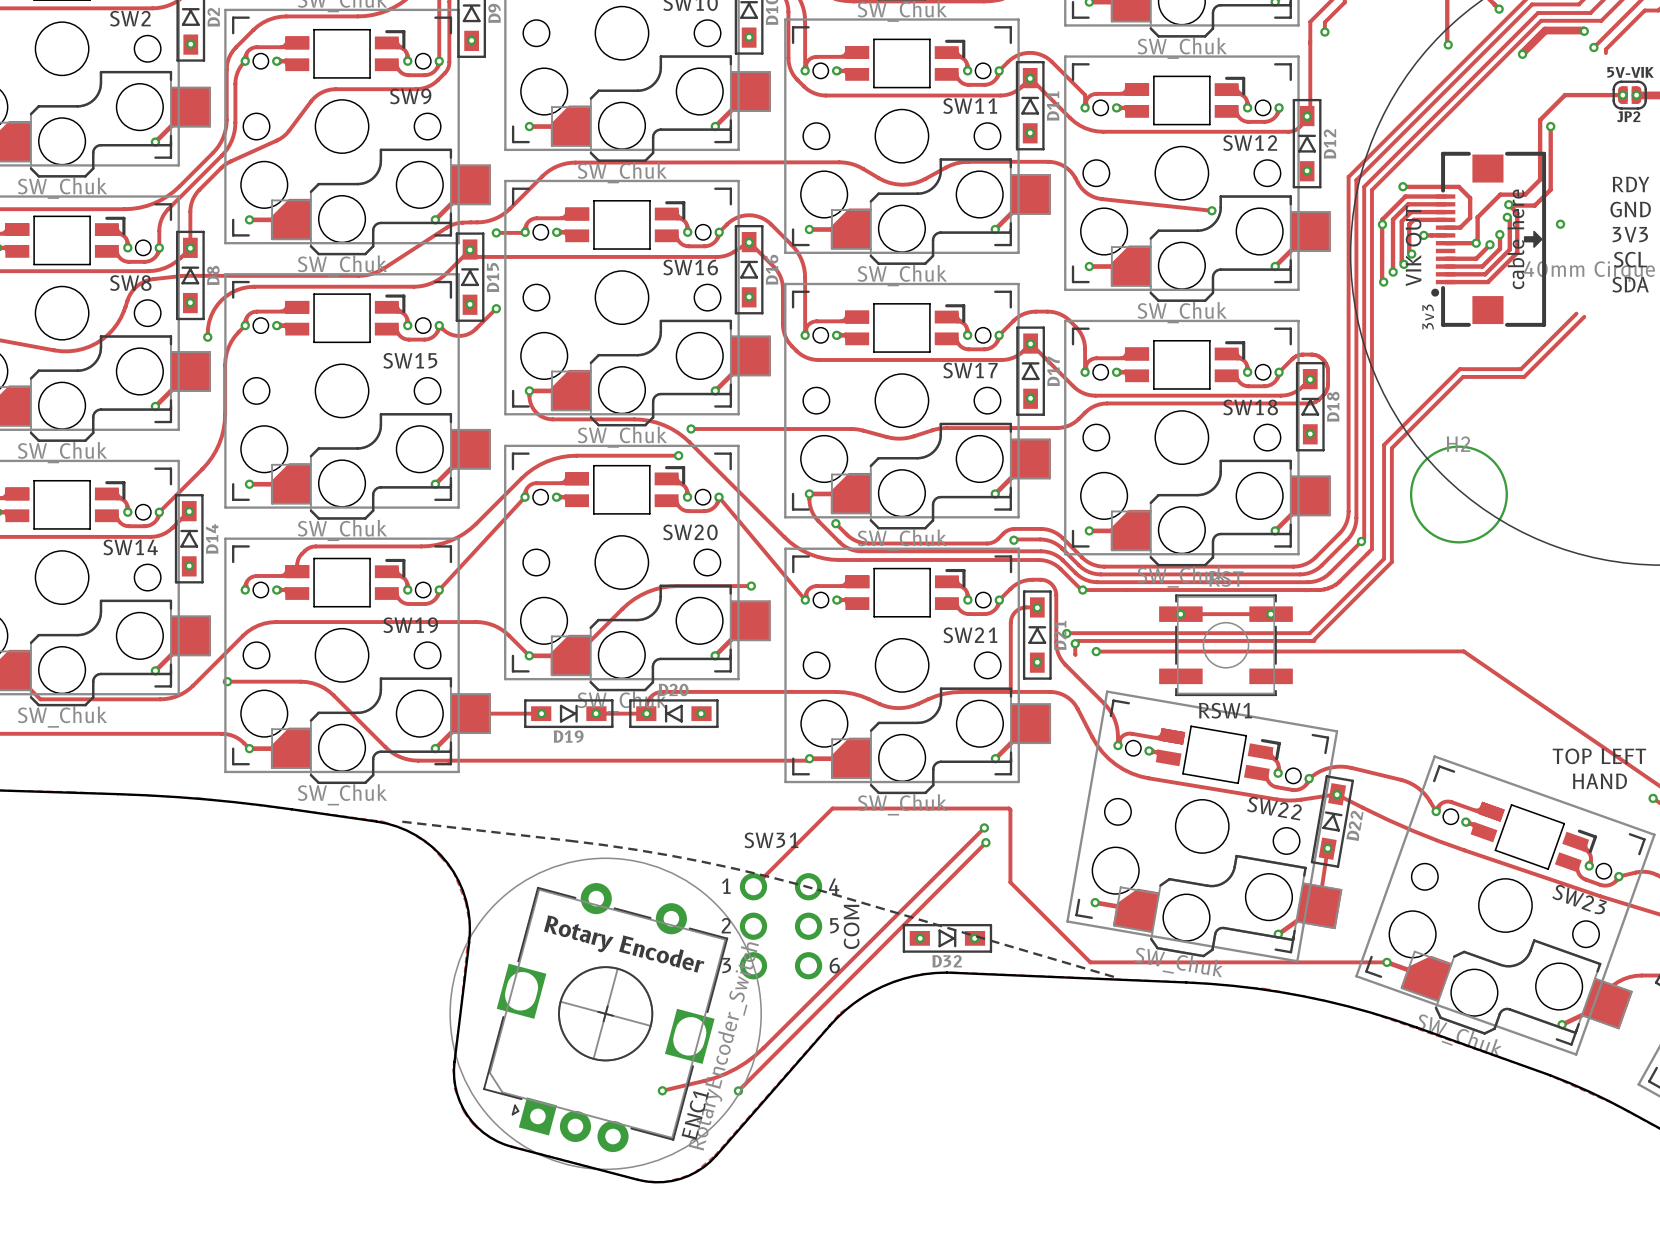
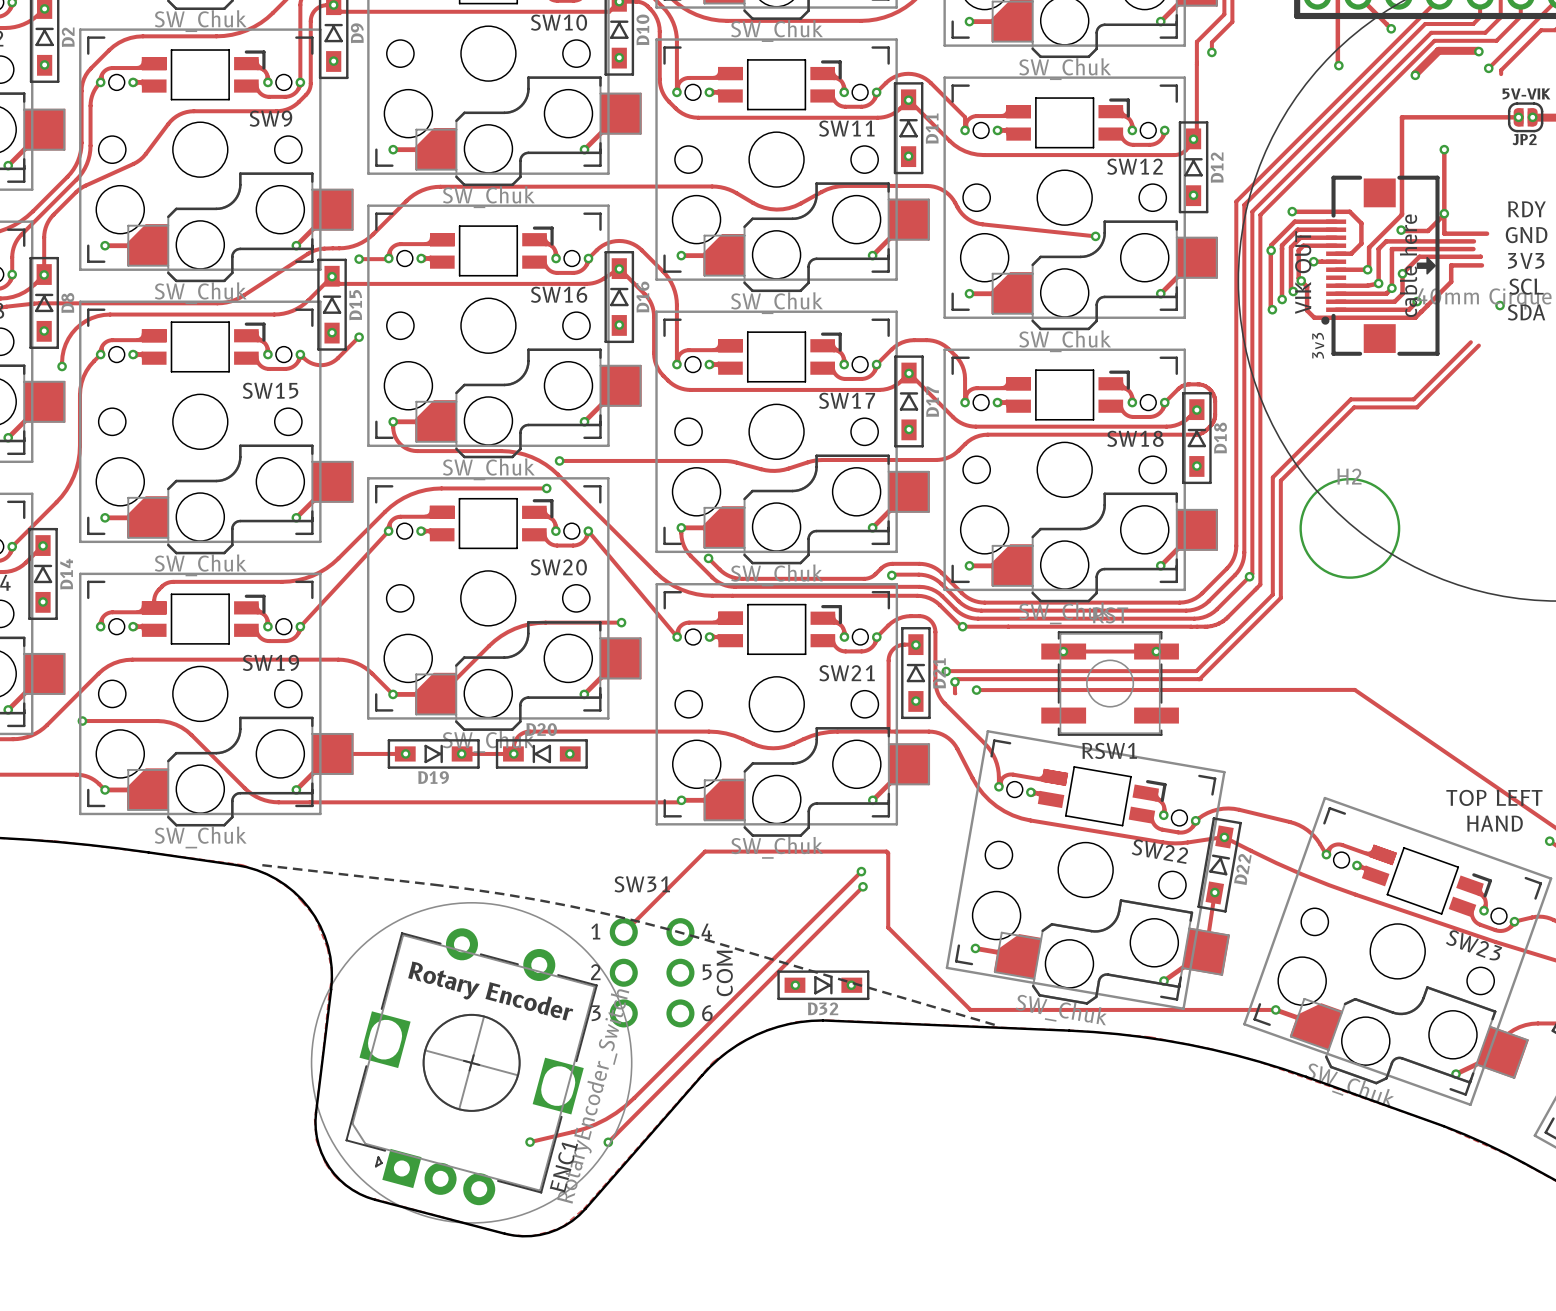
track: (1565, 95) (1540, 120) (1540, 179) (1525, 194) (1500, 194) (1477, 217) (1477, 221) -> (1459, 117) (1401, 117) (1401, 214) (1369, 247)
via: none -> (1444, 213)
track: none -> (1444, 214) (1444, 233)
track: (1508, 204) (1517, 213) (1517, 252) (1487, 282) -> (1417, 301) (1408, 309) (1379, 309)
track: none -> (1444, 233) (1487, 233)
track: (1507, 217) (1509, 219) (1509, 249) (1485, 274) -> (1480, 256) (1419, 256) (1402, 273) (1402, 293) (1394, 301) (1376, 301)
via: (1507, 217) -> none
via: (1560, 224) -> none
via: (1499, 234) -> none
track: (1500, 234) (1500, 248) (1482, 266) -> (1473, 249) (1391, 249) (1391, 288) (1386, 293) (1373, 293)
track: none -> (1481, 265) (1451, 265) (1451, 281) (1415, 317) (1314, 317) (1307, 310) (1307, 286) (1301, 280)
track: (1489, 244) (1476, 258) -> (1473, 241) (1386, 241) (1378, 248) (1378, 283) (1367, 285)
via: (1489, 244) -> none
via: none -> (1402, 273)
via: none -> (1378, 283)
via: none -> (1391, 288)
via: none -> (1417, 301)
via: none -> (1500, 305)

